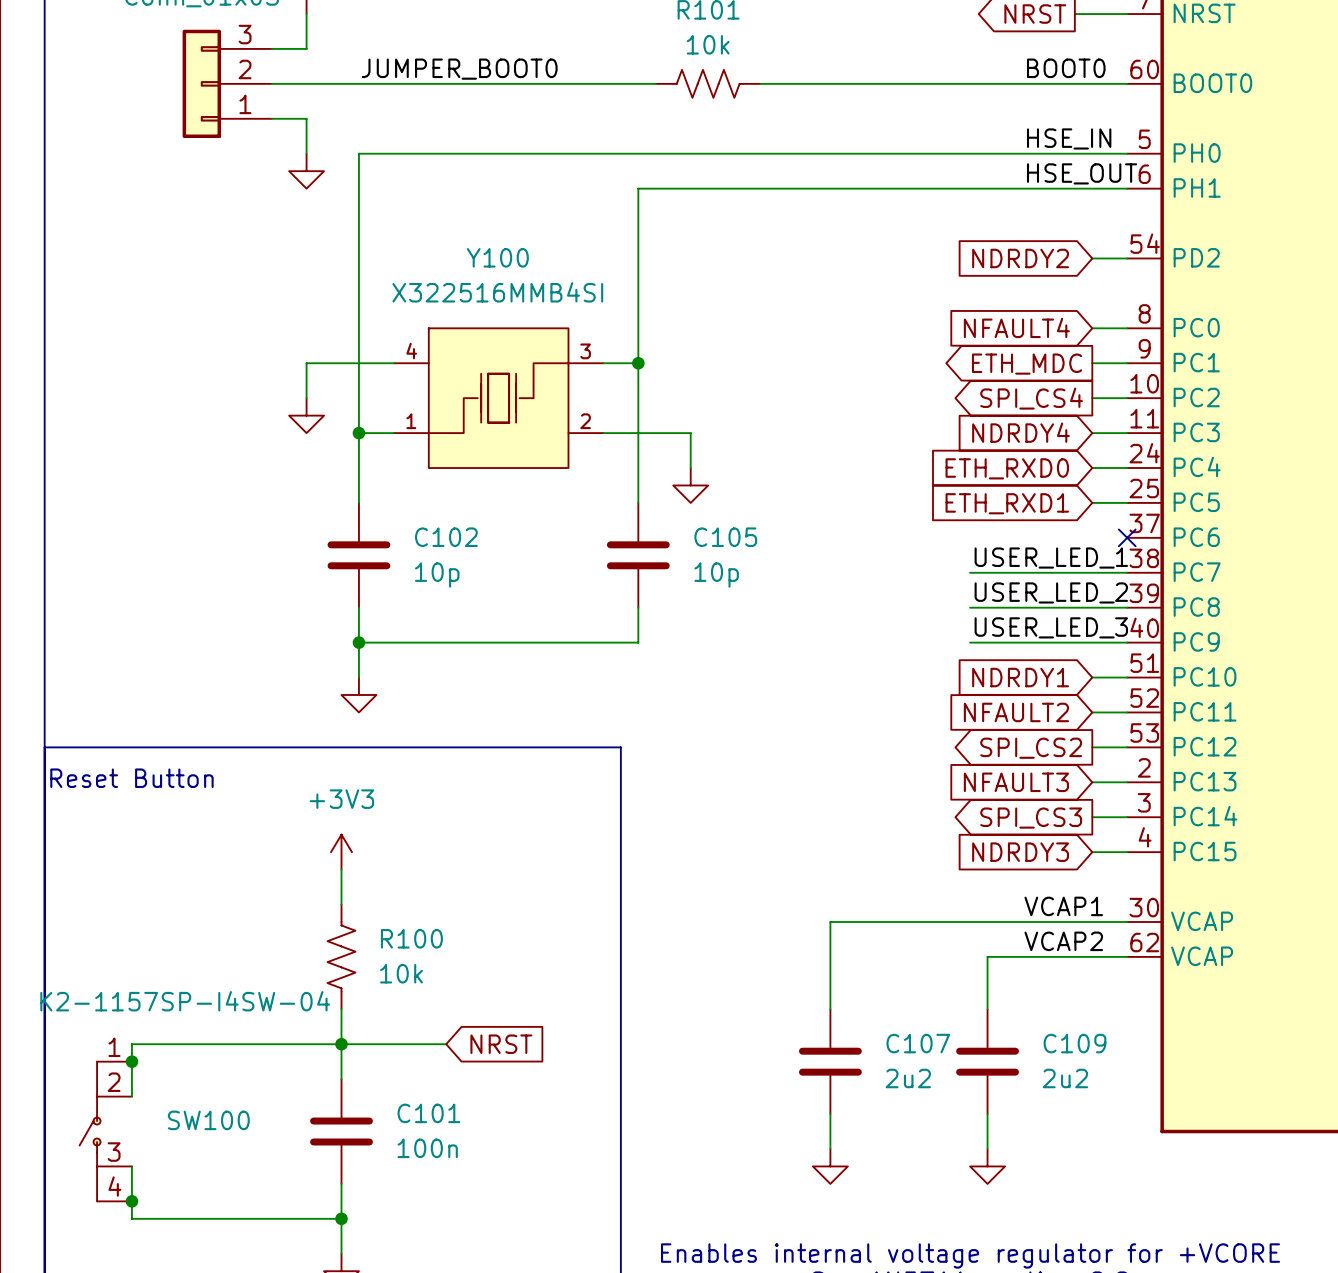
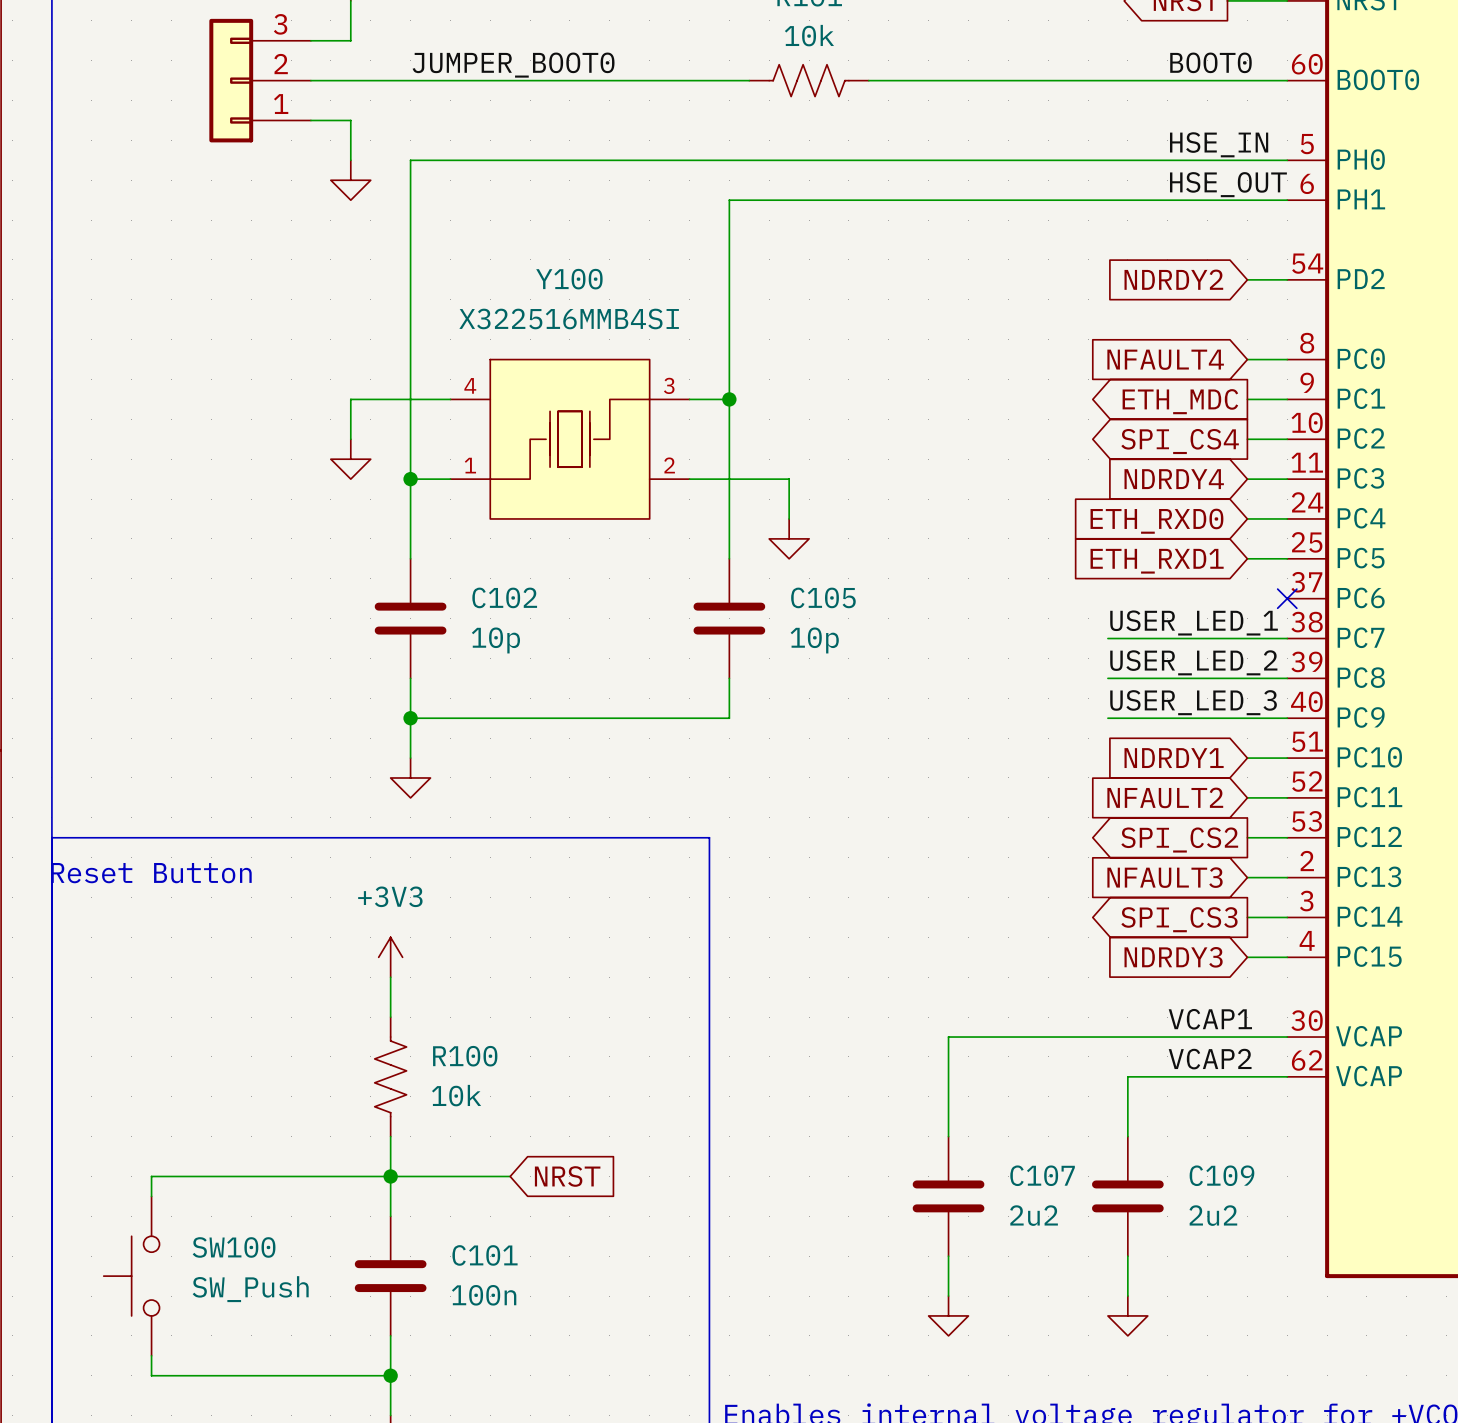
SW100 value: K2-1157SP-I4SW-04 (185, 1001) -> SW_Push (250, 1289)
SW100 symbol: [79, 1061, 132, 1202] -> [103, 1196, 160, 1356]
junction: (131, 1061) -> none
junction: (131, 1201) -> none

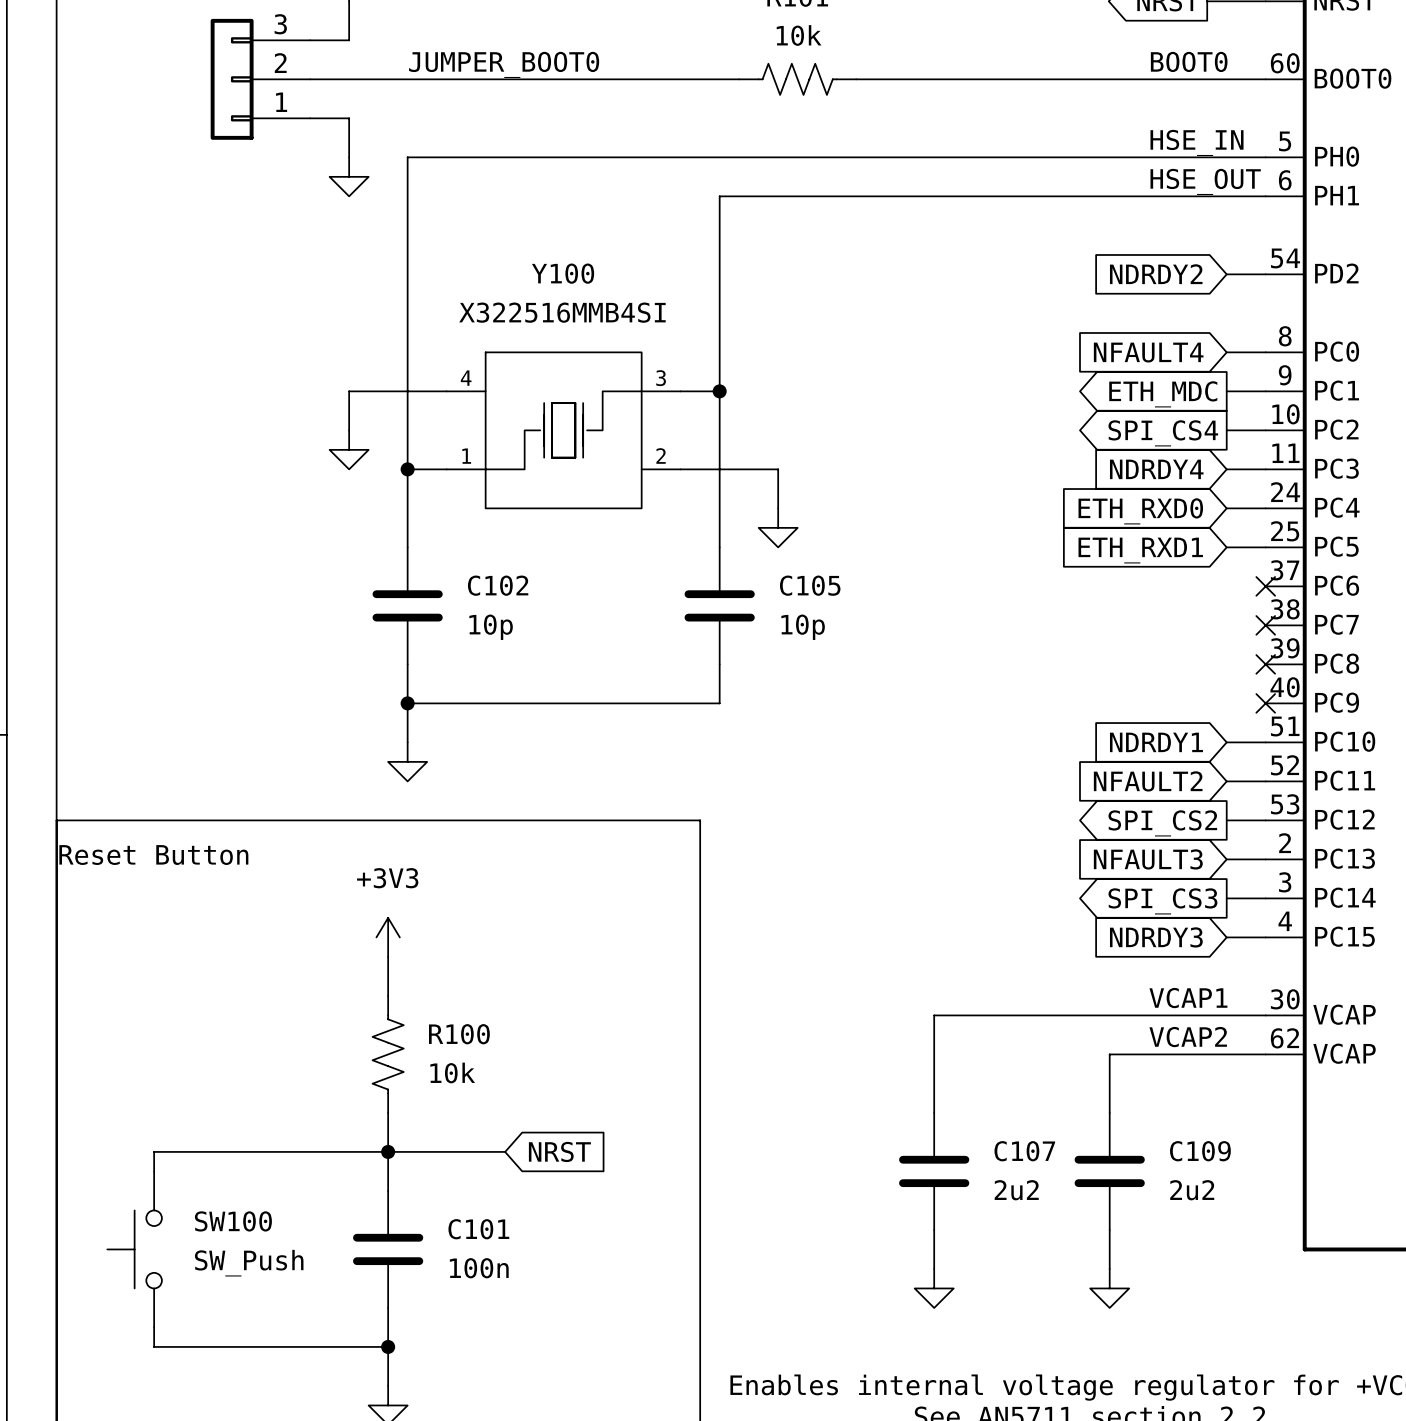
label: USER_LED_1 (1194, 622) -> none
wire: (1107, 638) (1287, 638) -> none
no-connect mark: none -> (1265, 625)
label: USER_LED_2 (1193, 662) -> none
wire: (1107, 678) (1287, 678) -> none
no-connect mark: none -> (1265, 664)
label: USER_LED_3 (1193, 702) -> none
wire: (1107, 718) (1287, 718) -> none
no-connect mark: none -> (1265, 703)

